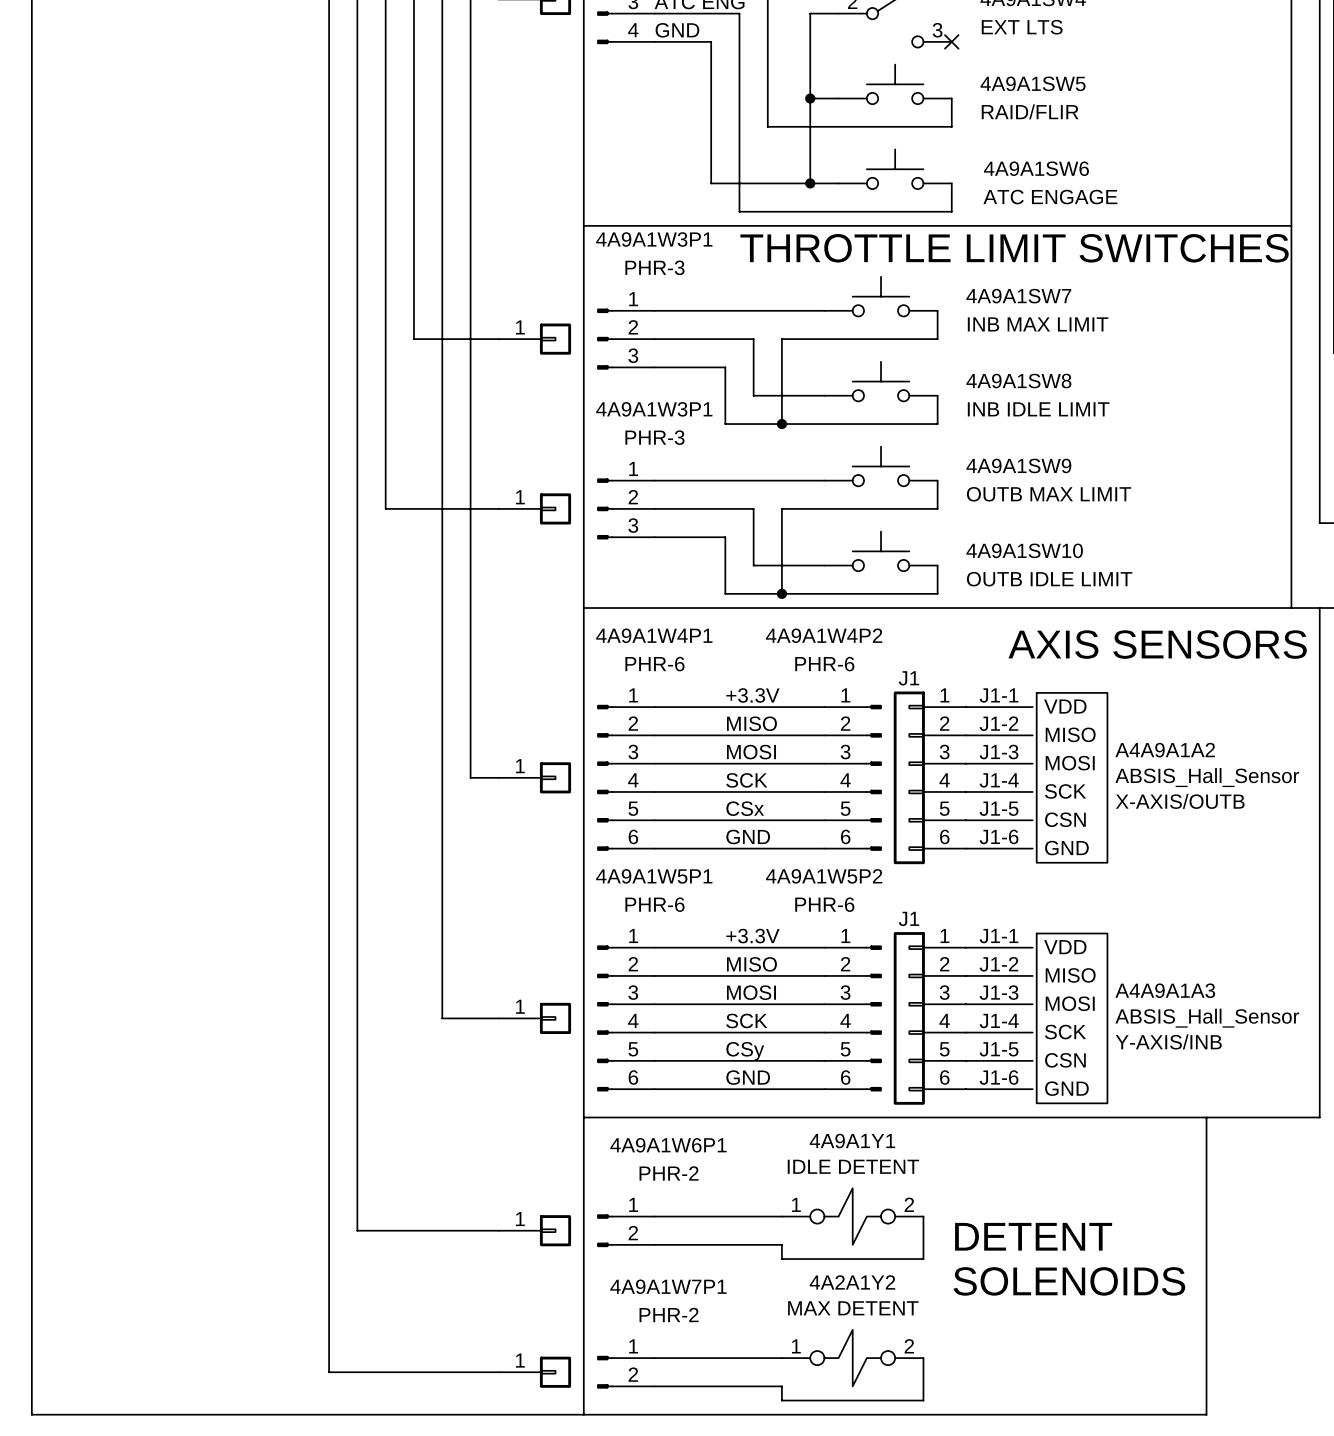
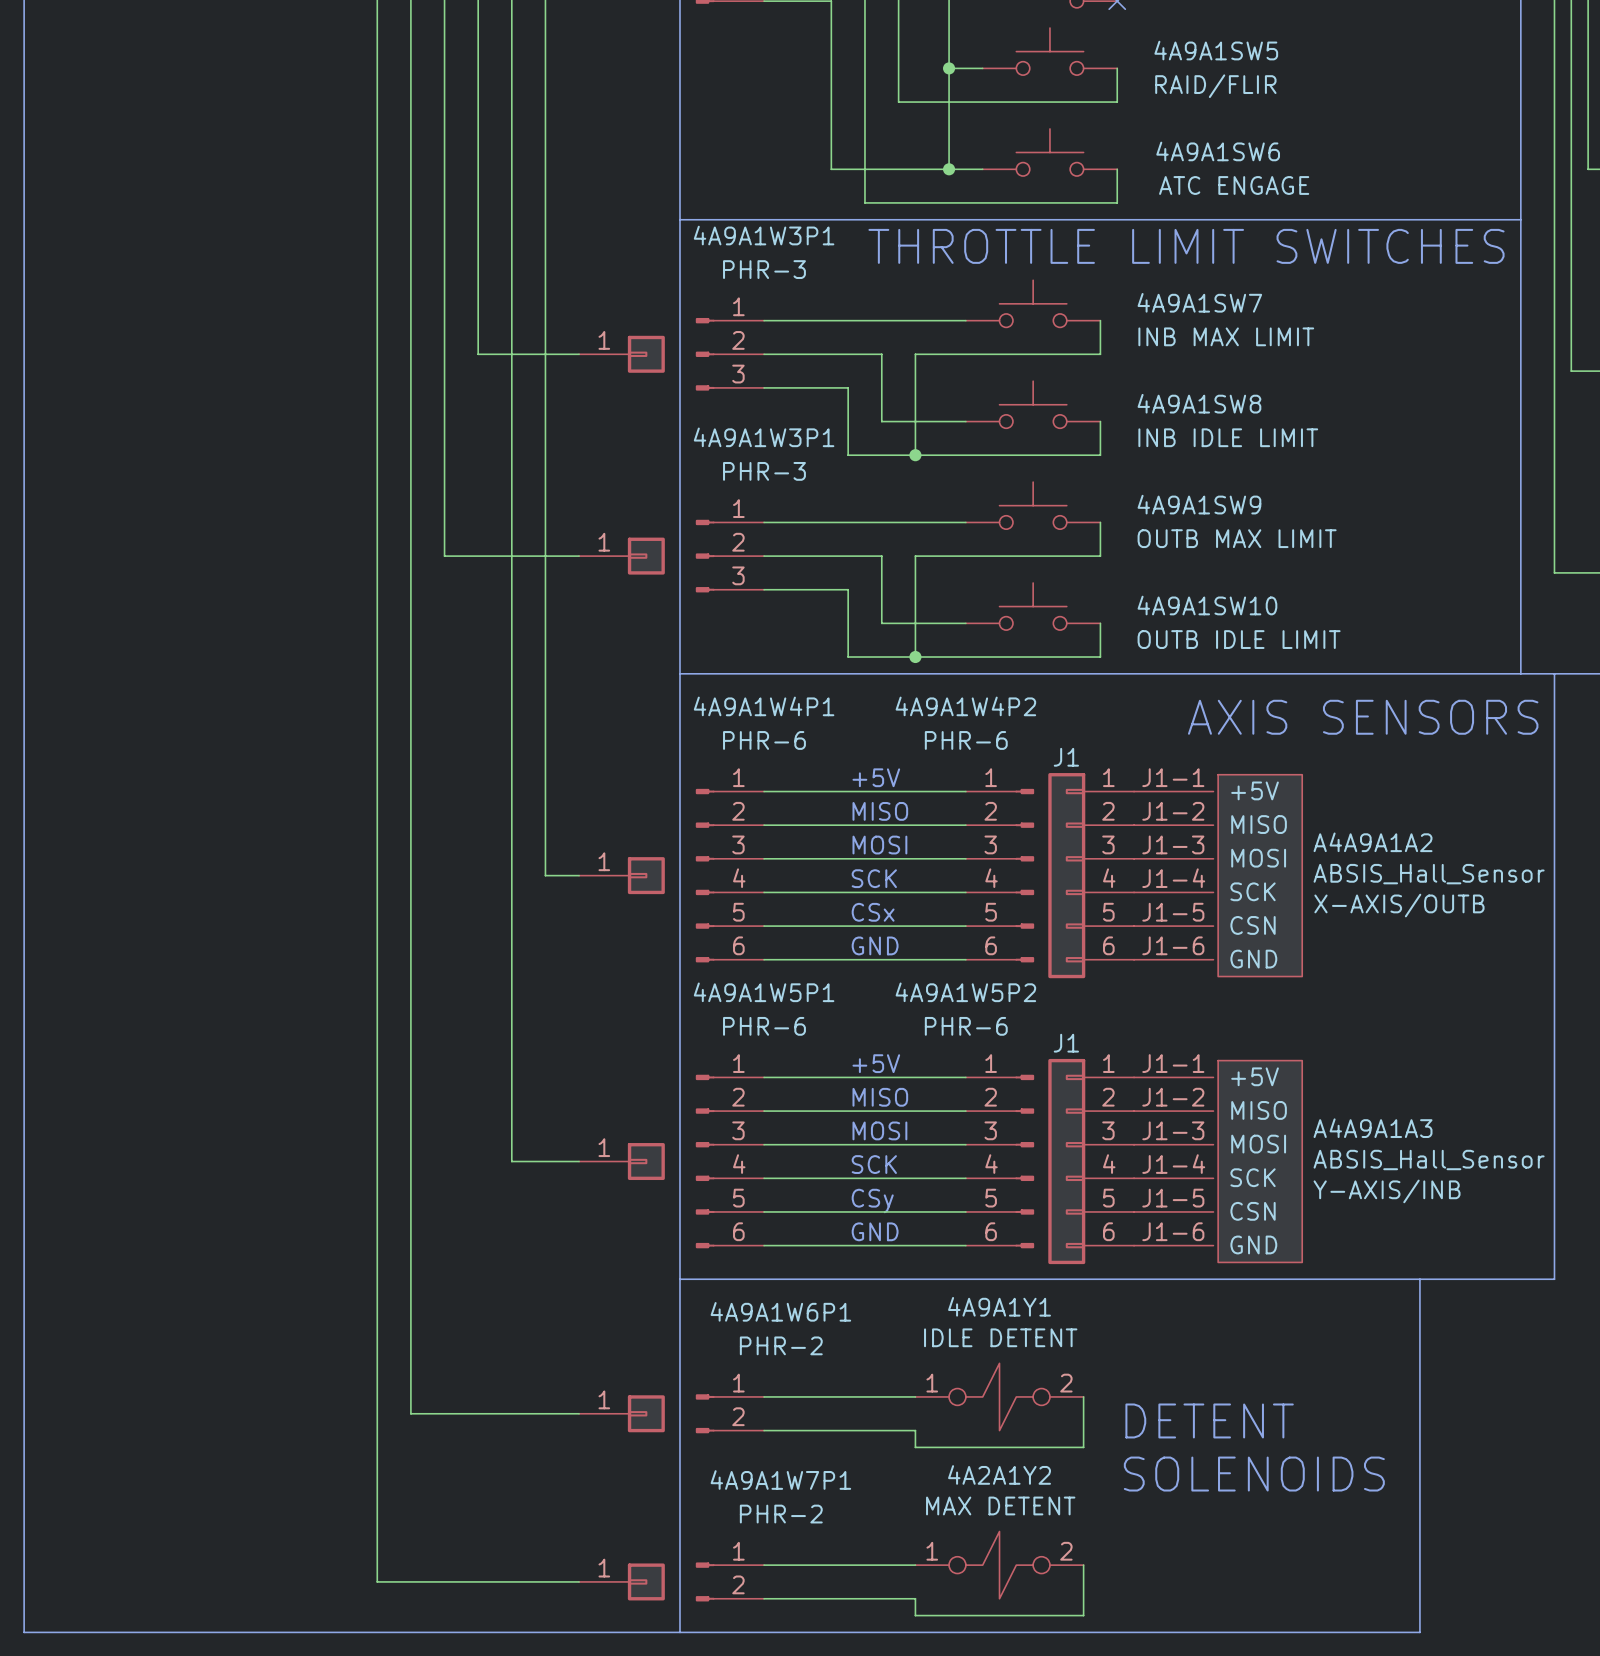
text: +3.3V (752, 695) -> +5V (876, 777)
A4A9A1A2 pin name: VDD (1065, 706) -> +5V (1255, 790)
text: +3.3V (752, 936) -> +5V (876, 1063)
A4A9A1A3 pin name: VDD (1065, 947) -> +5V (1255, 1076)

